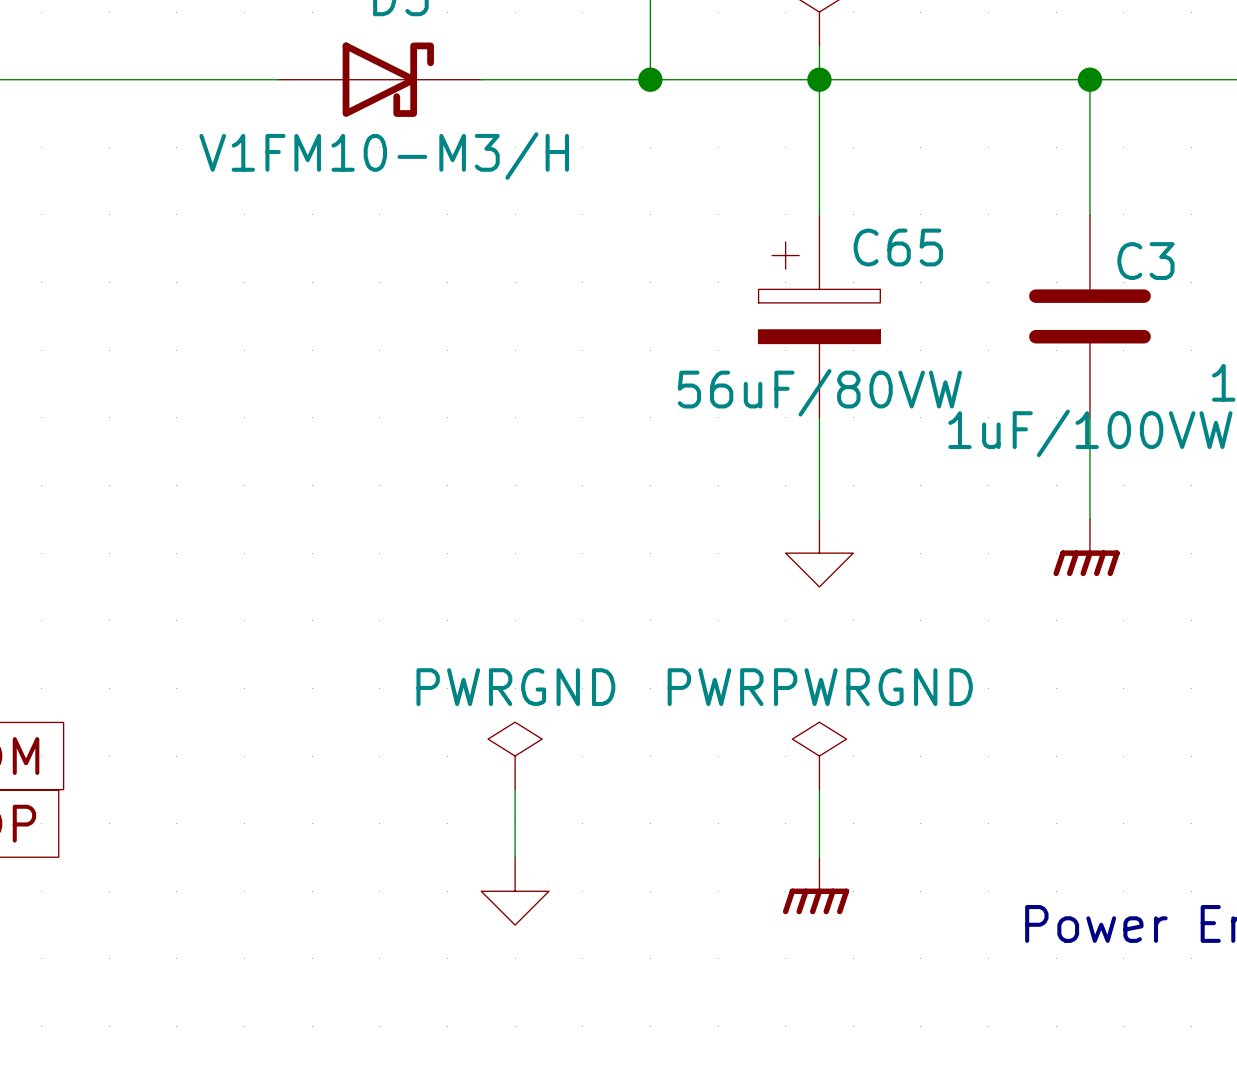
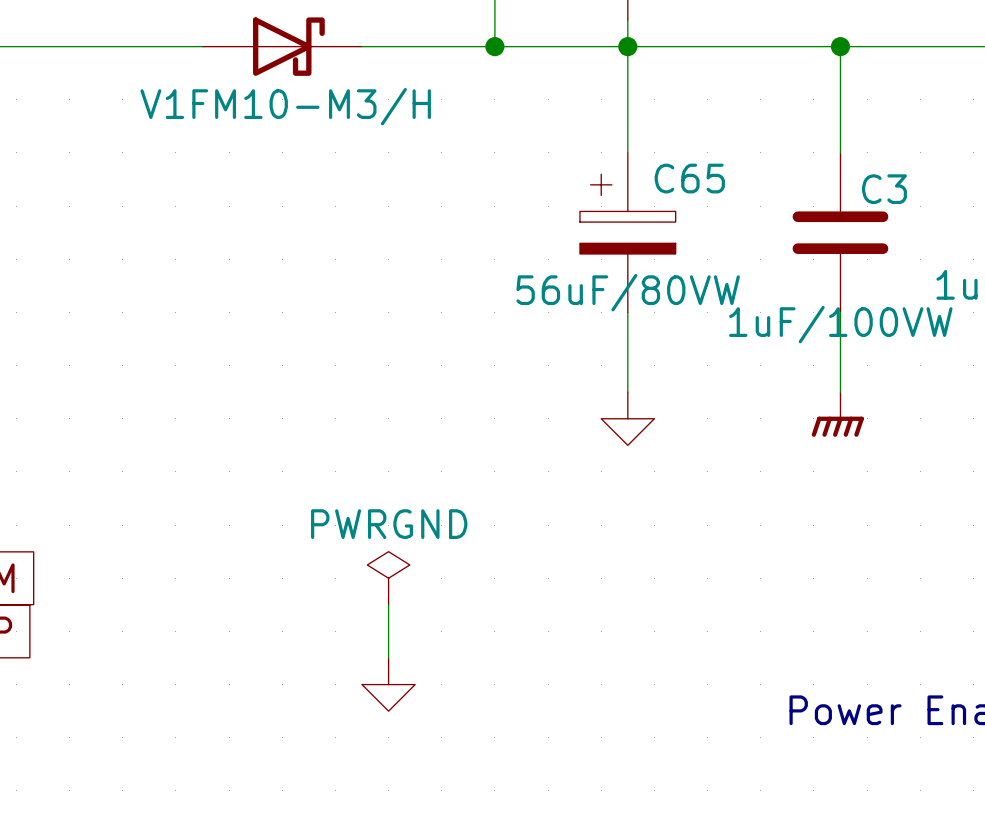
power symbol: PWRPWRGND (819, 756) -> none
wire: (819, 789) (819, 857) -> none
power symbol: (816, 885) -> none

